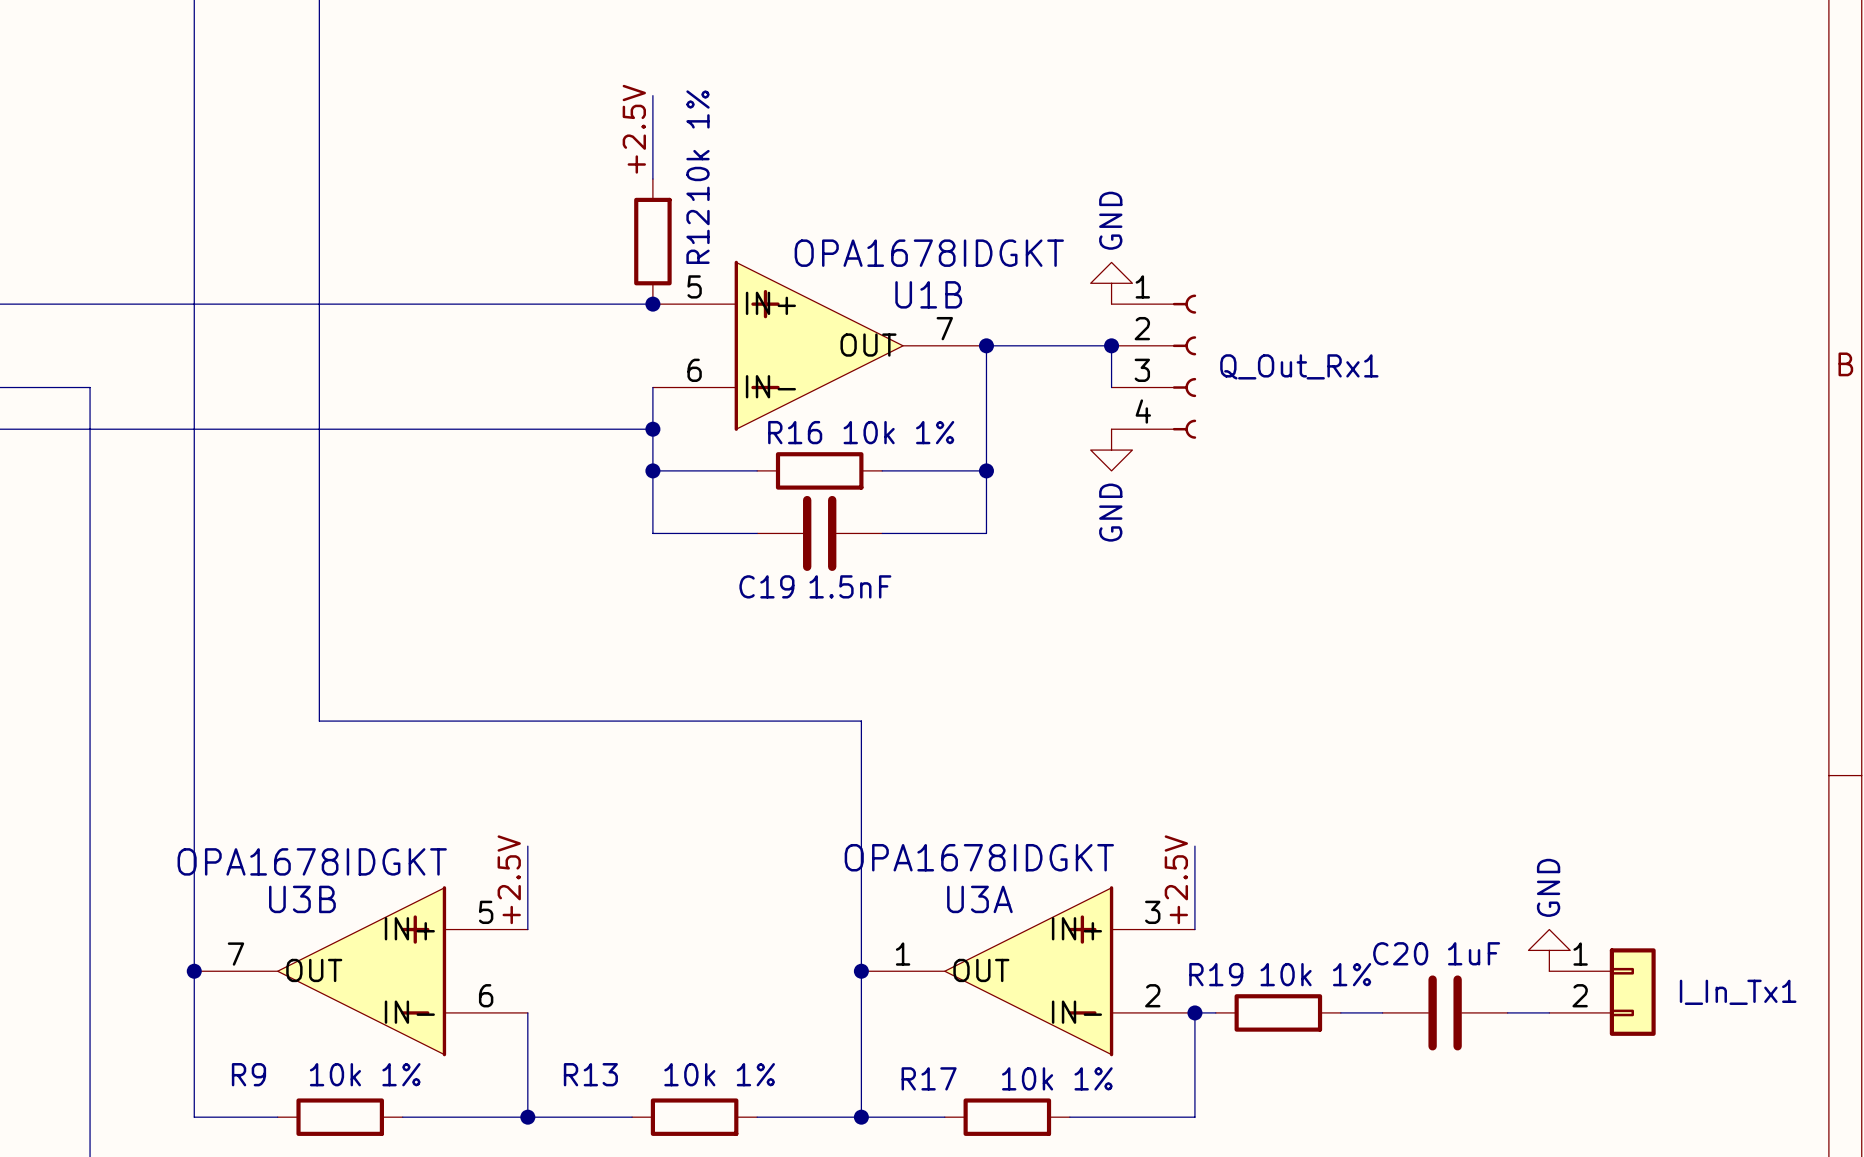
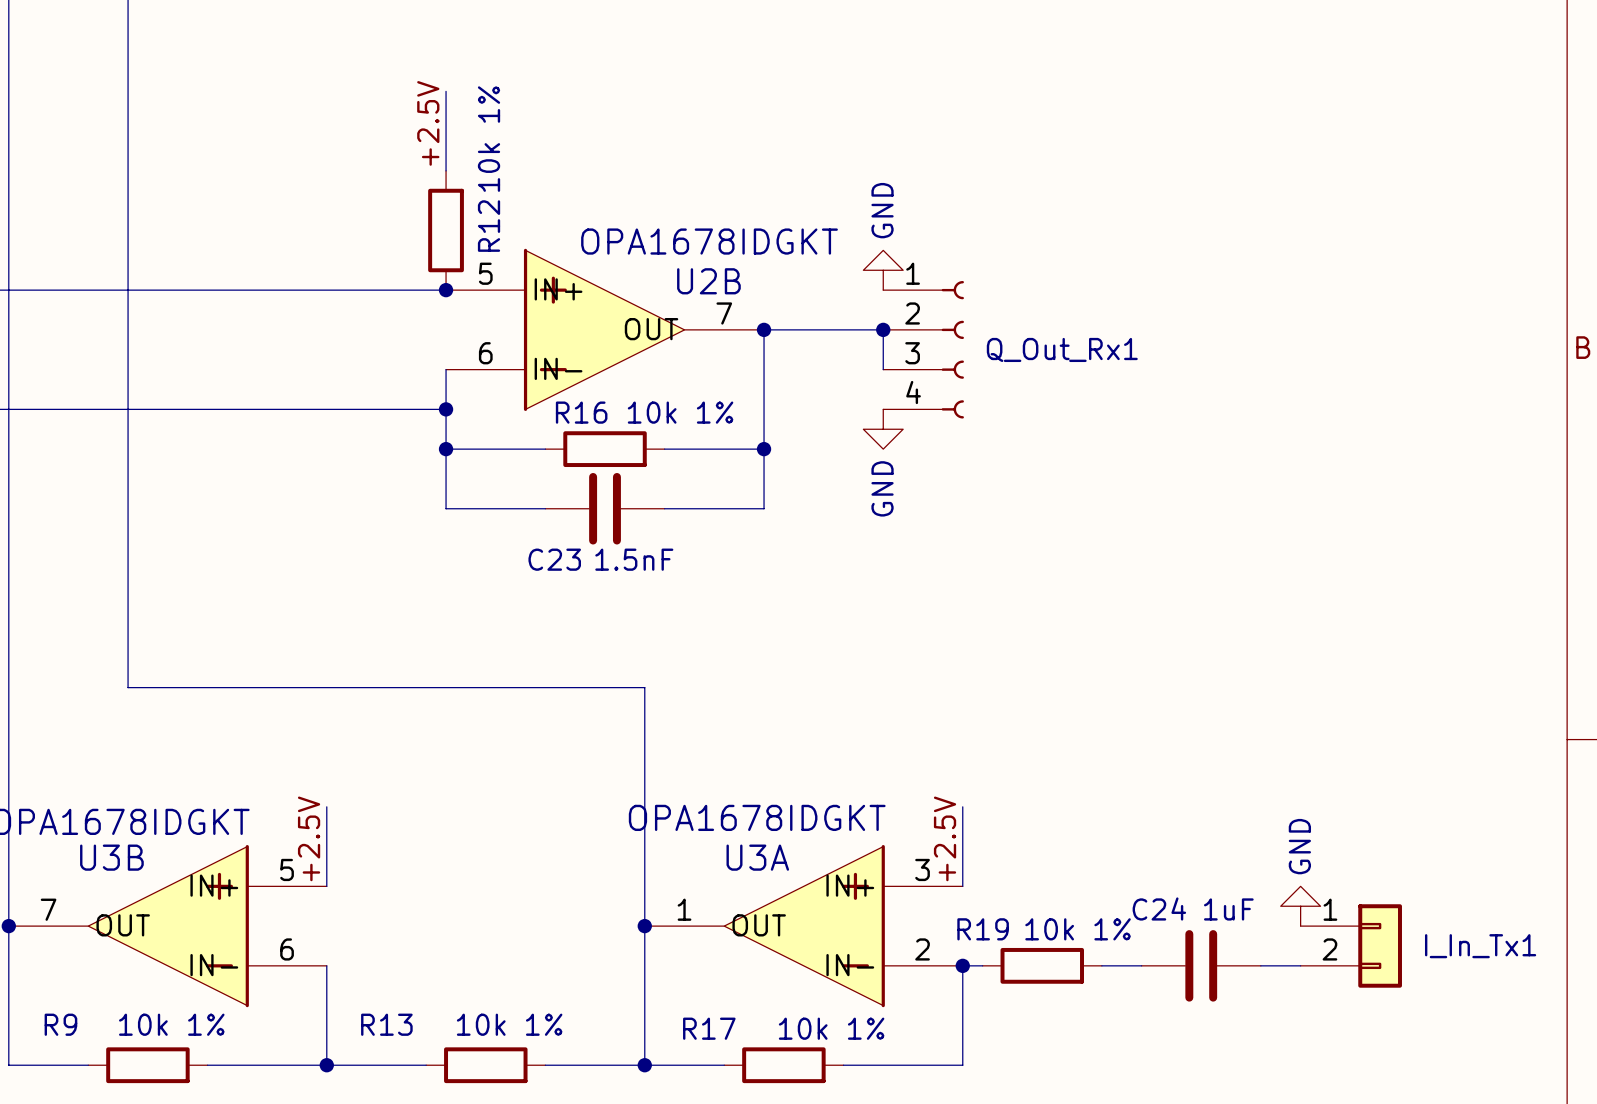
U1B name: U1B (928, 294) -> U2B (708, 281)
C19 name: C19 (766, 586) -> C23 (554, 559)
C20 name: C20 (1400, 953) -> C24 (1159, 908)

